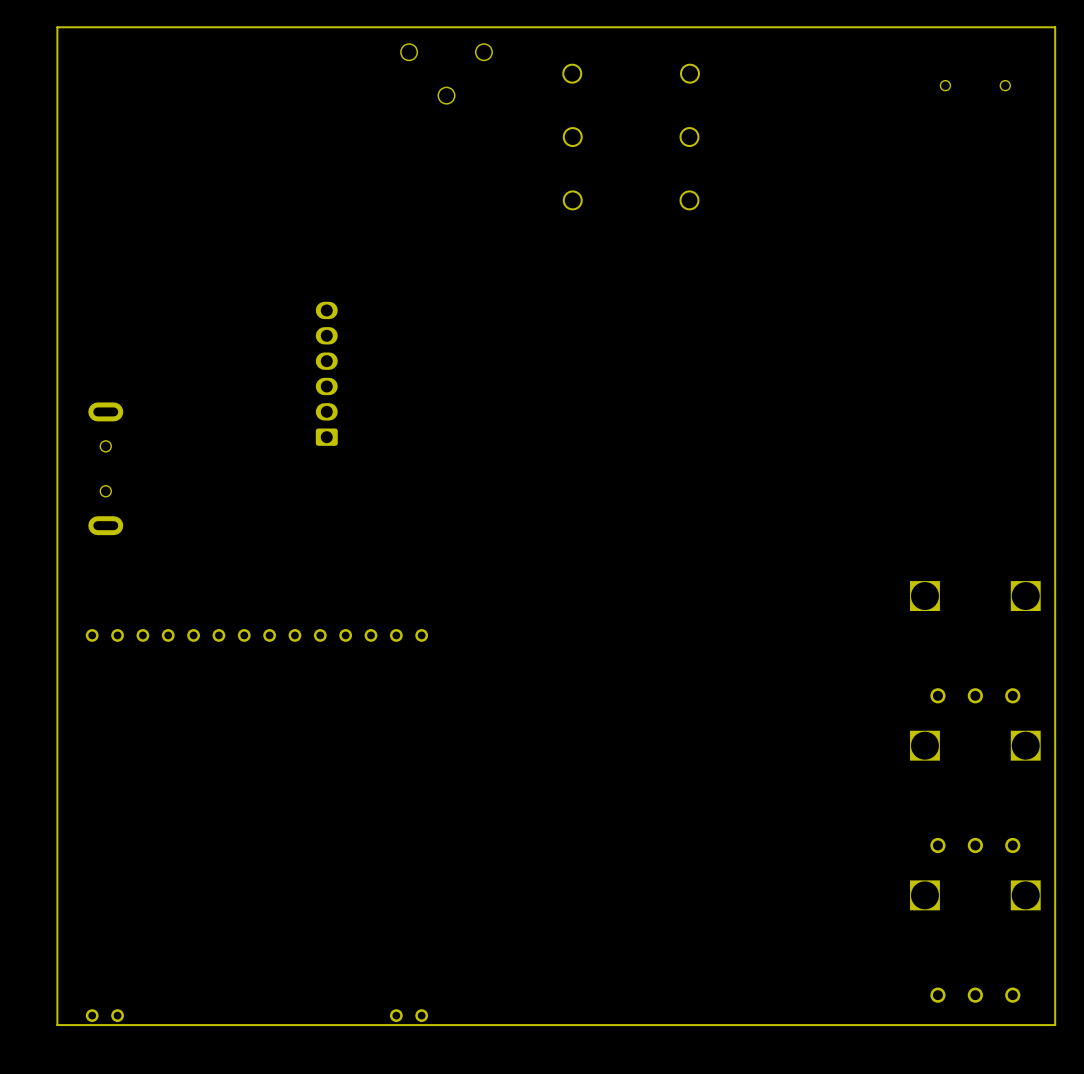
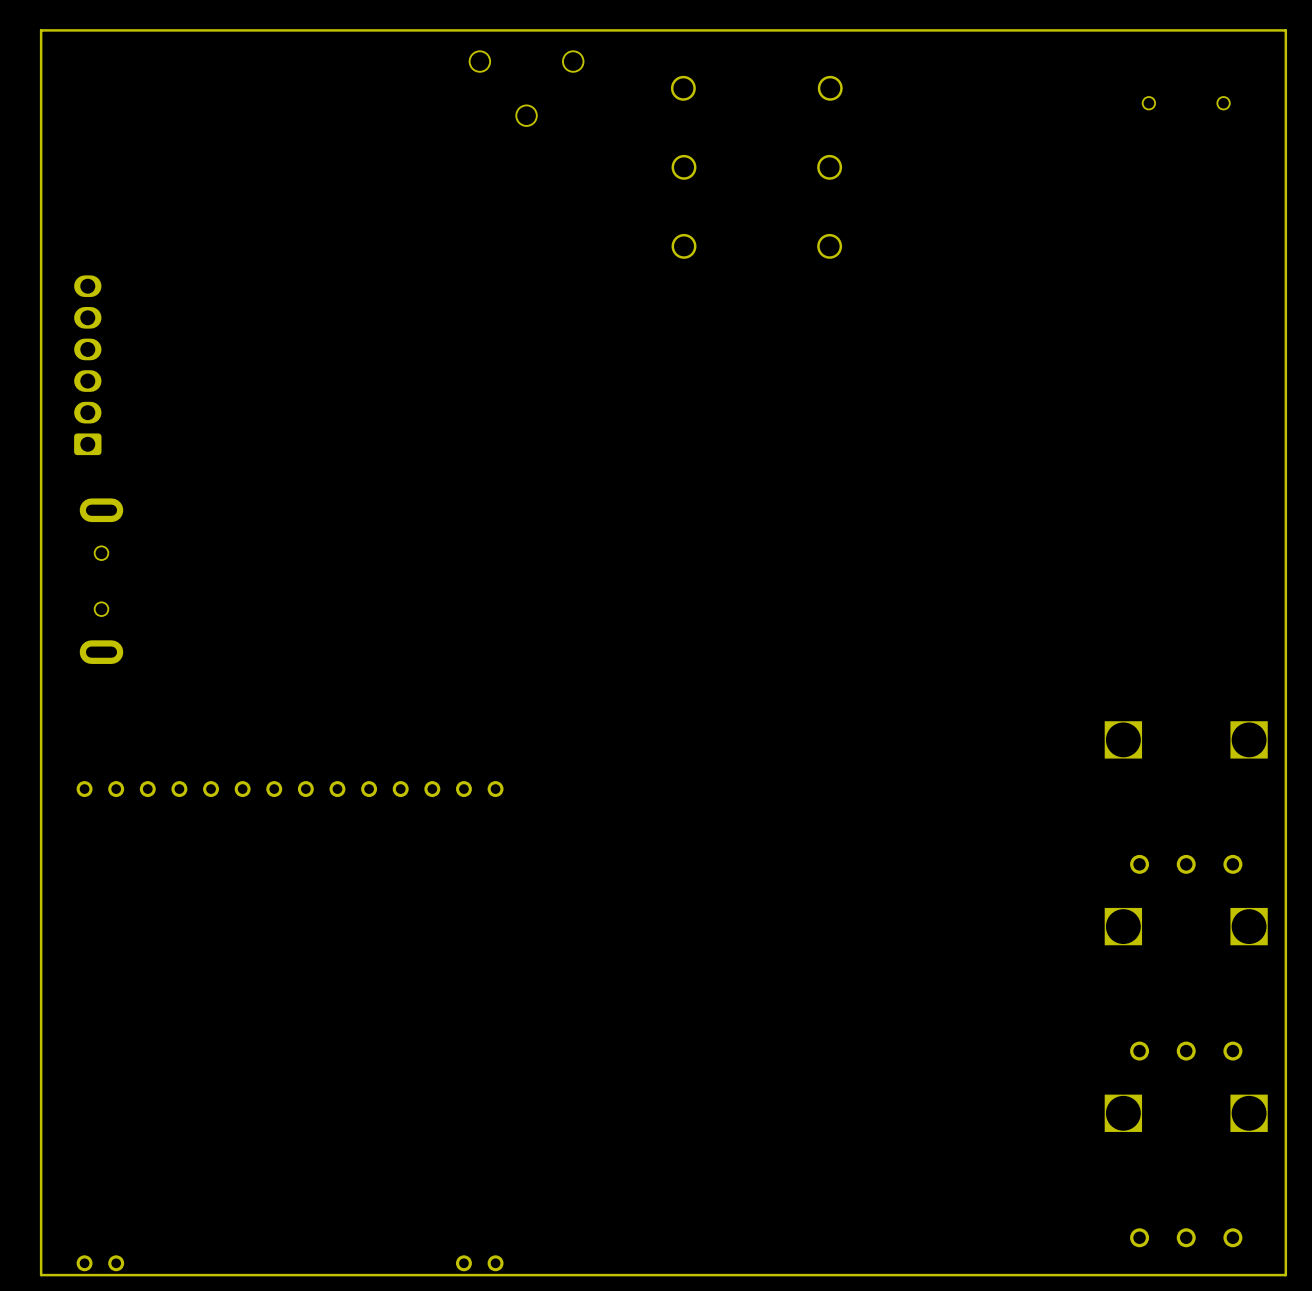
part position: (326, 373) -> (87, 365)

